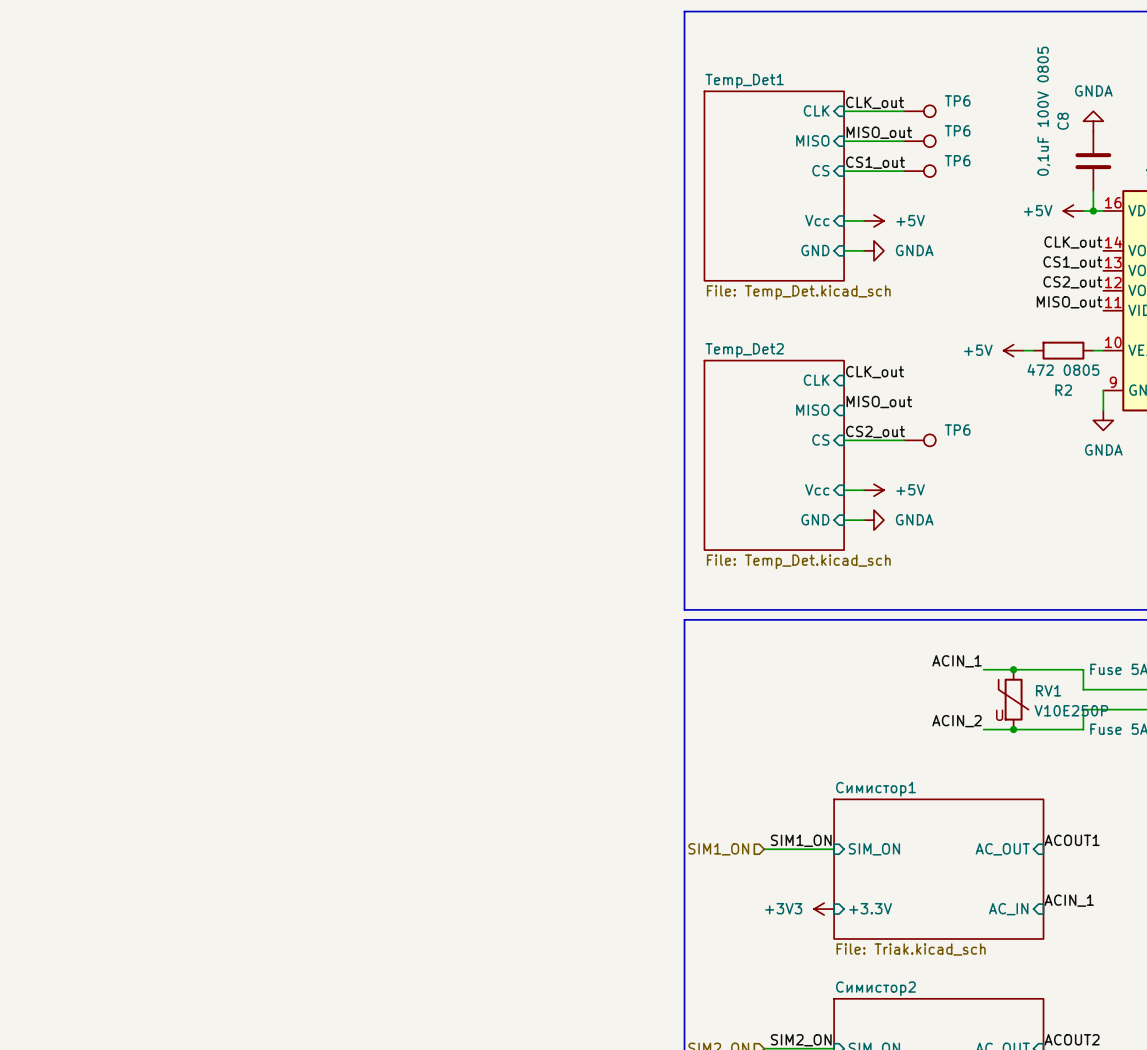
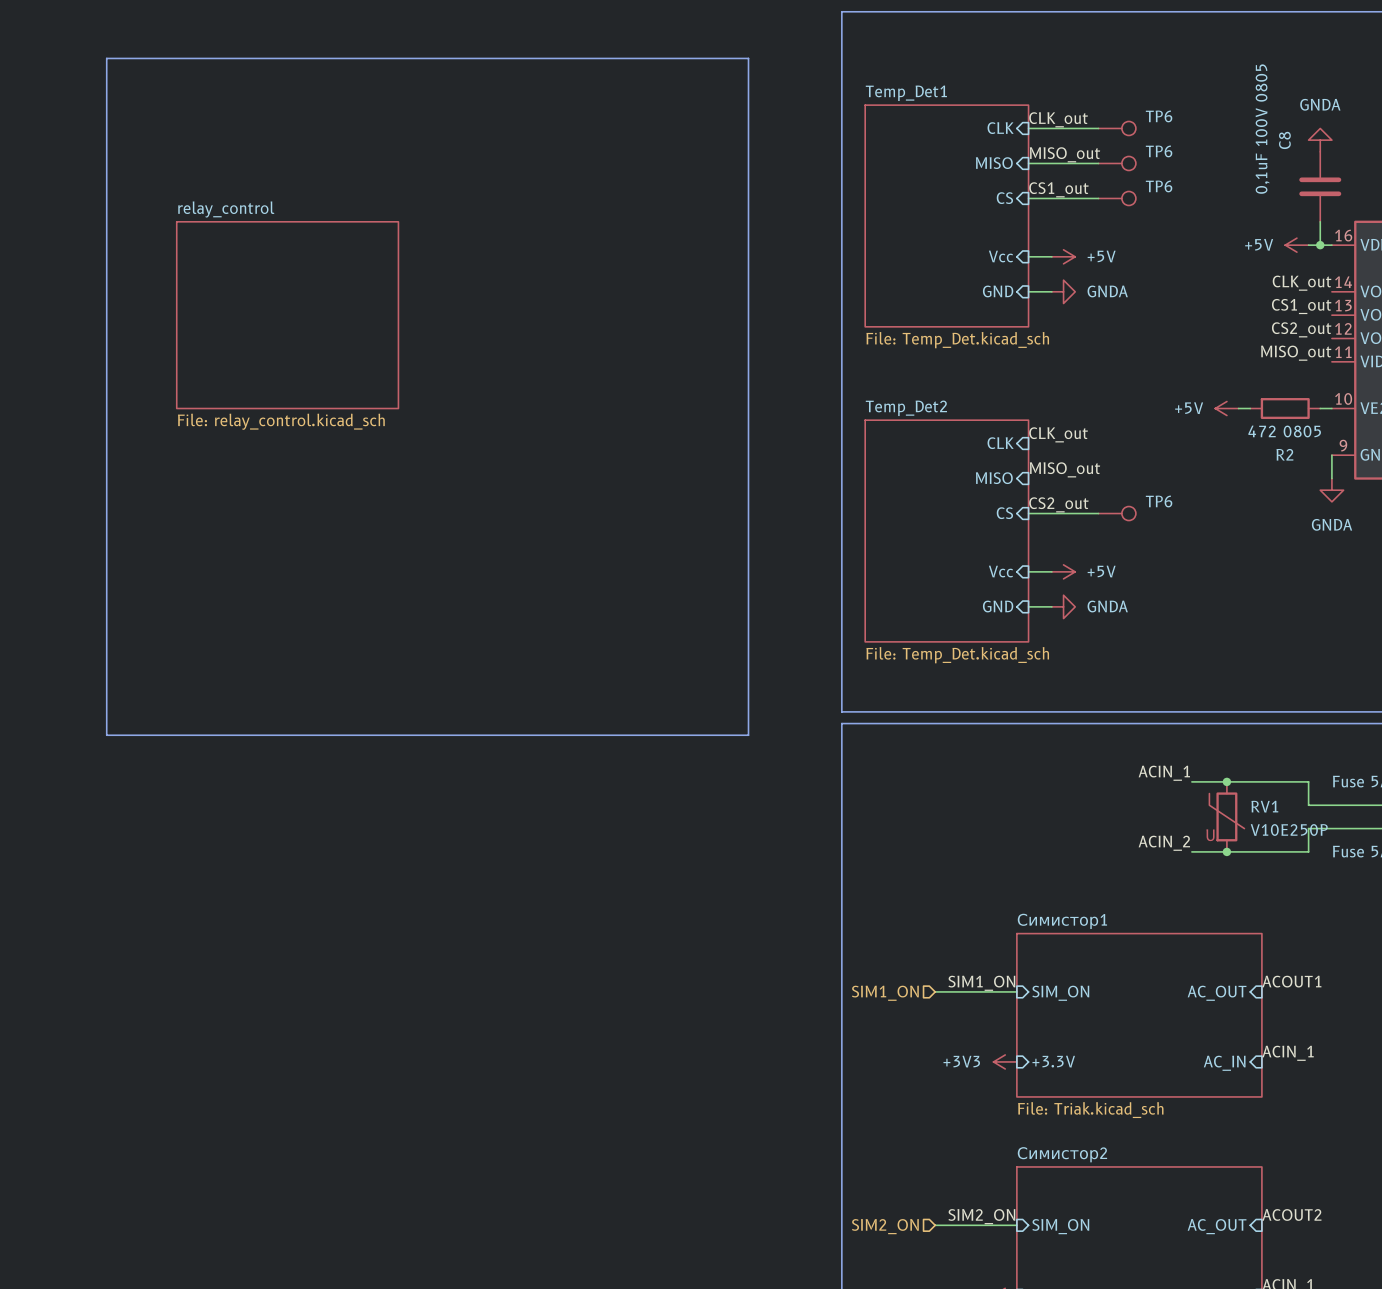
line: none -> (106, 58) (748, 58) (748, 735) (106, 735) (106, 58)
sheet relay_control: none -> File: relay_control.kicad_sch (287, 315)

